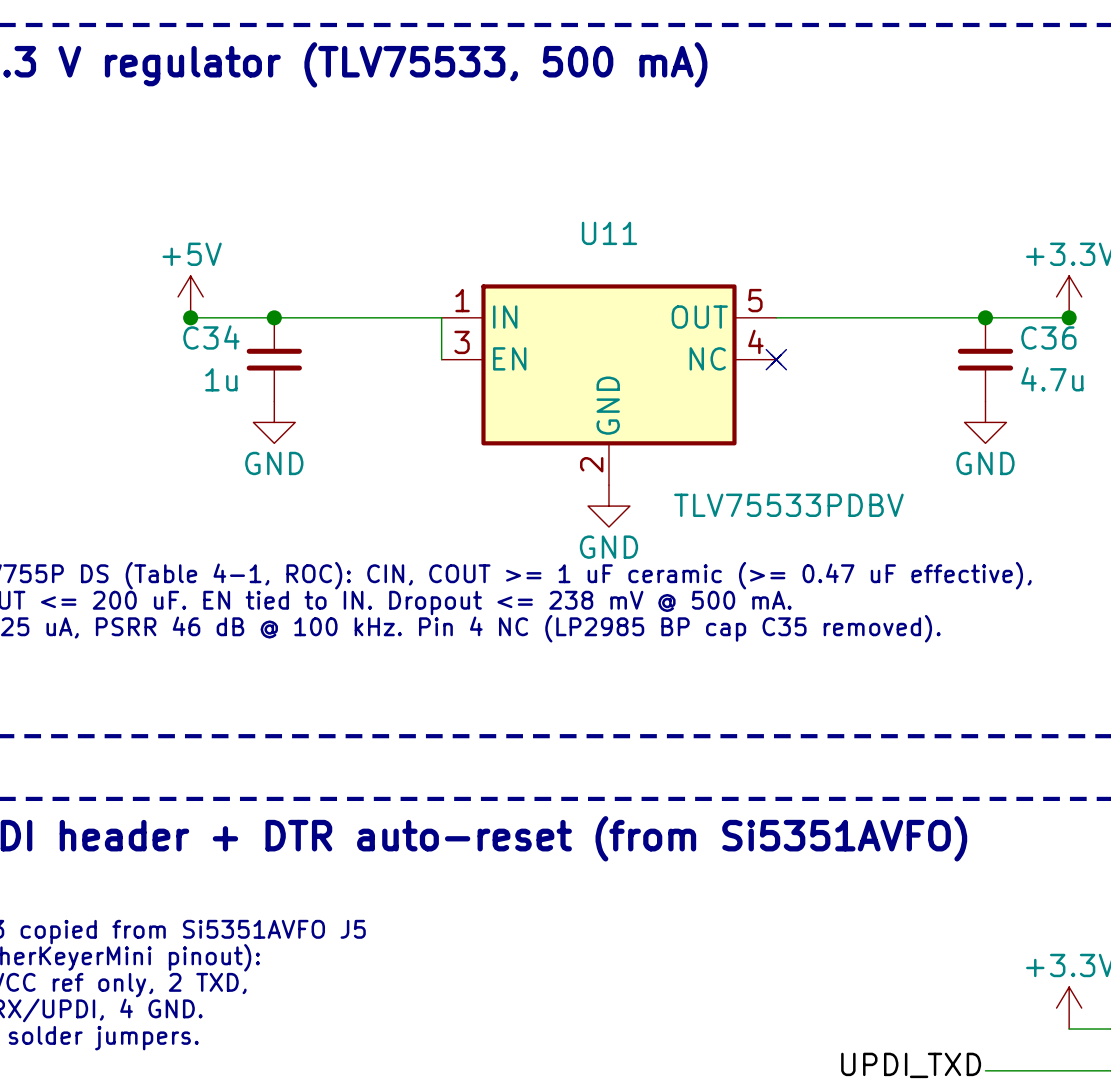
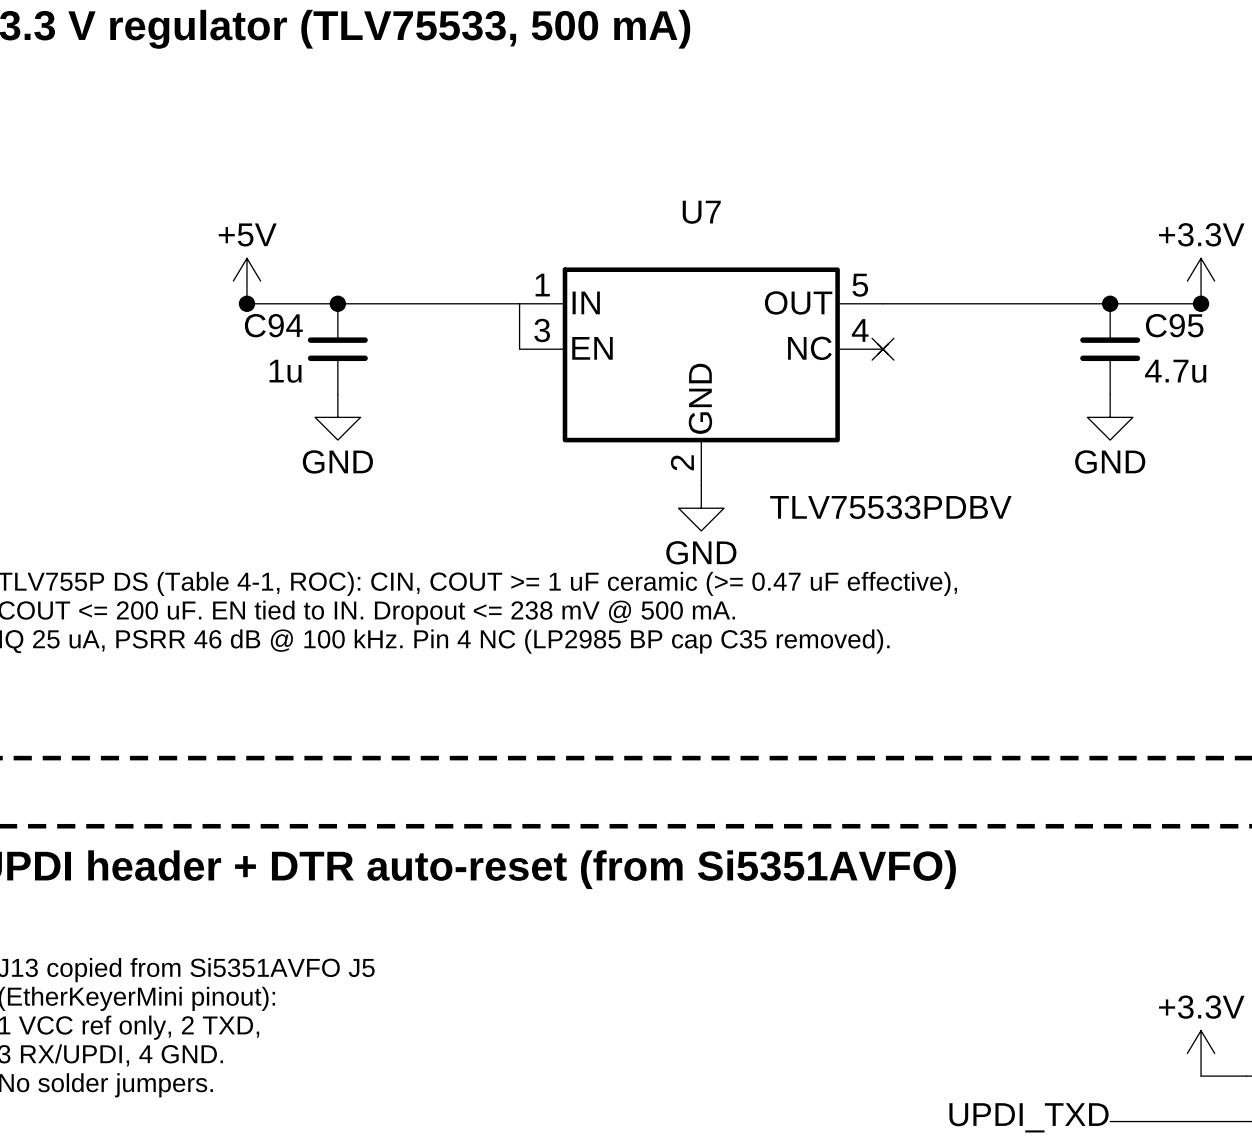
U11 name: U11 (609, 233) -> U7 (701, 212)
C34 name: C34 (211, 337) -> C94 (273, 325)
C36 name: C36 (1048, 337) -> C95 (1174, 325)

